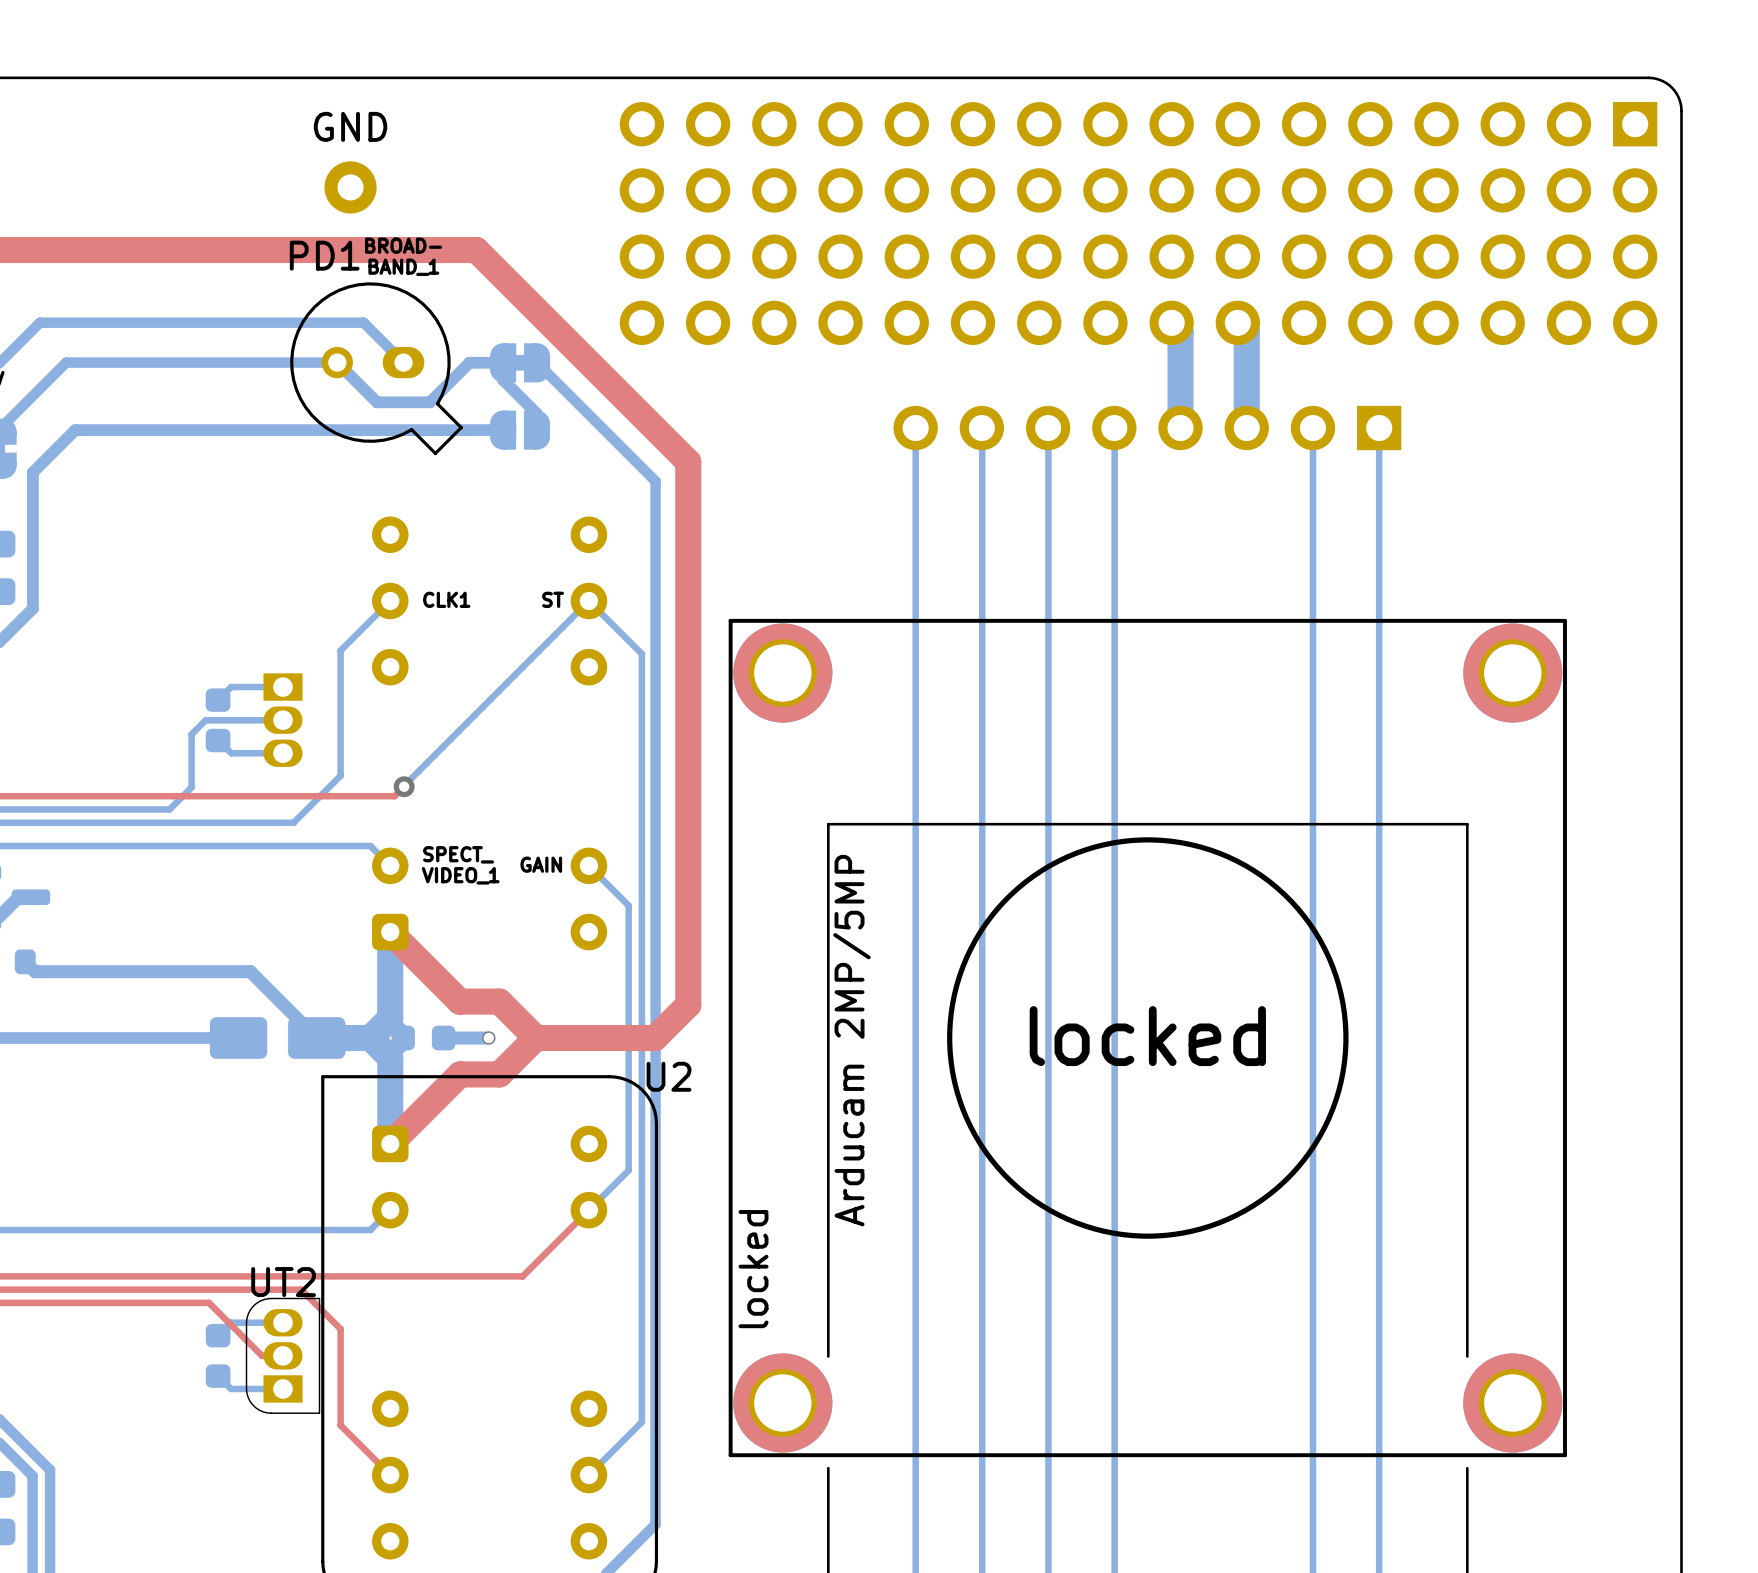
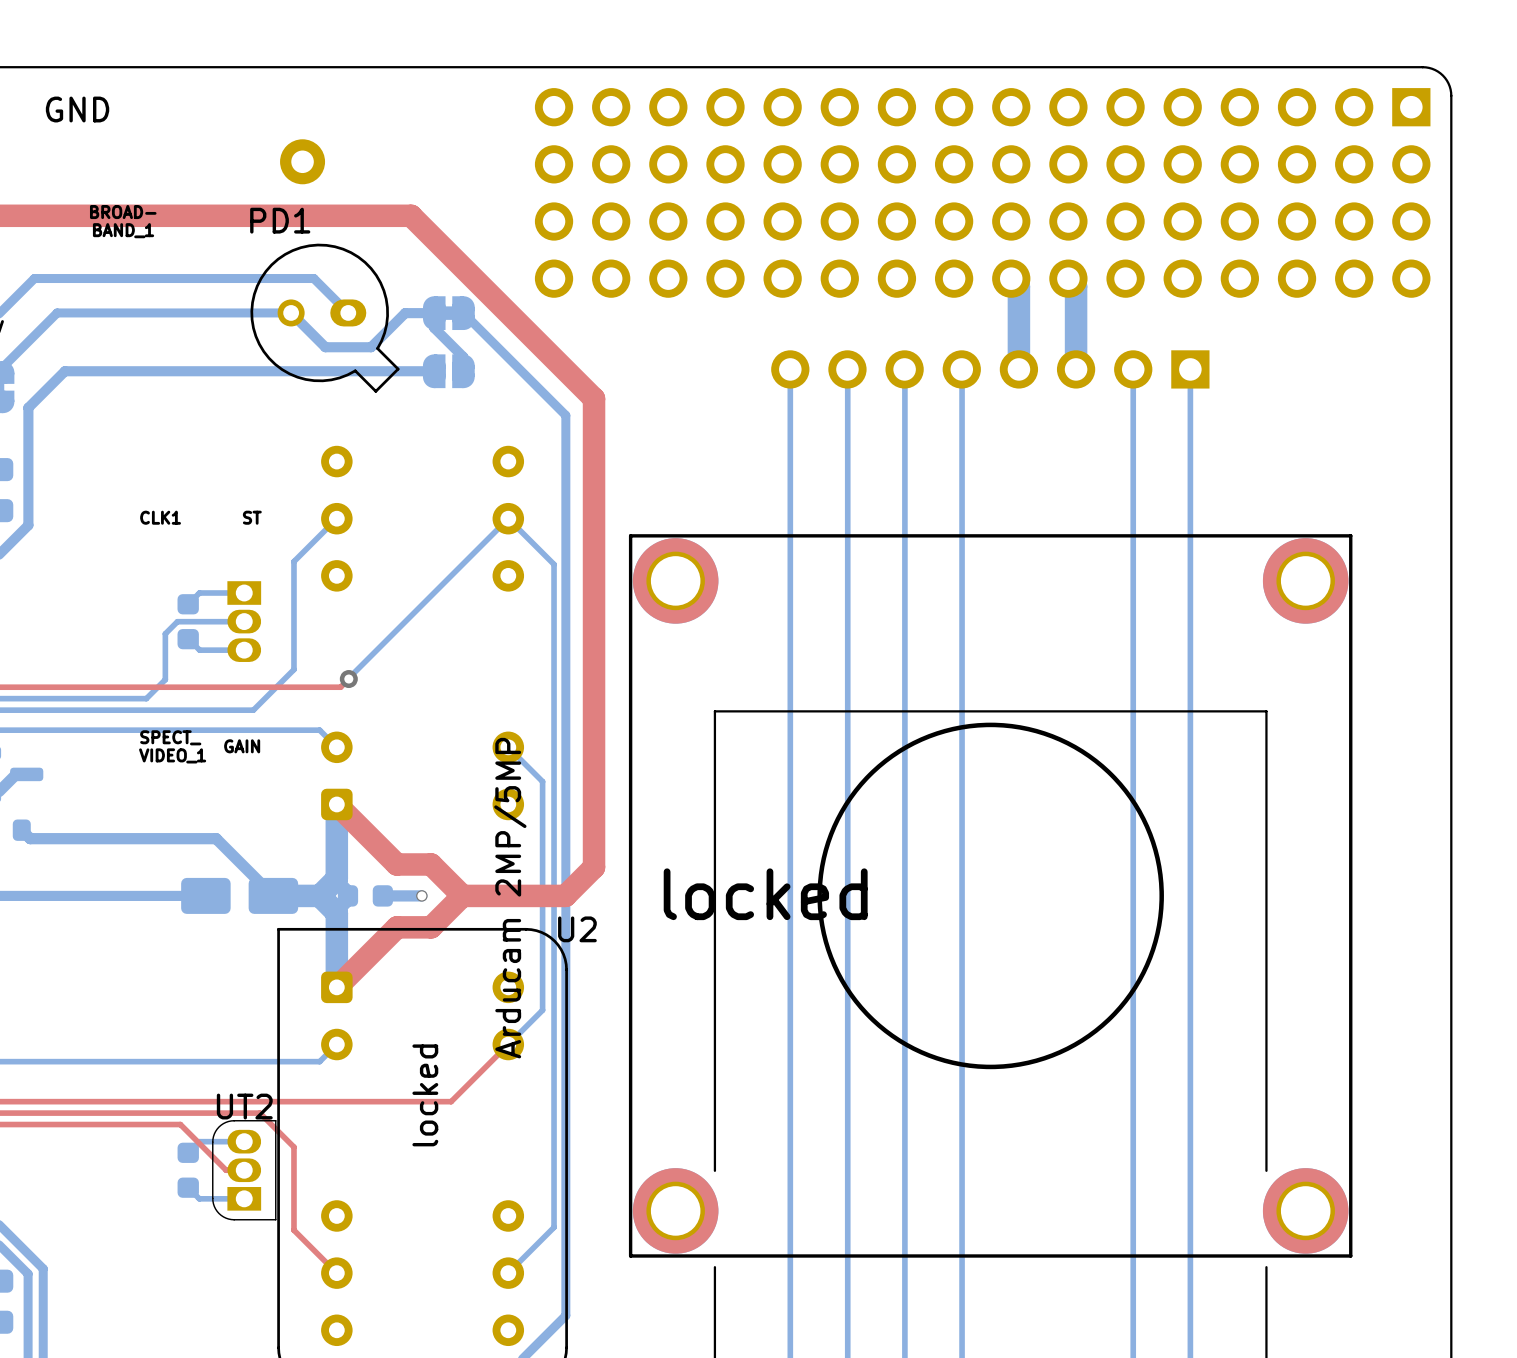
text position: GND (350, 126) -> GND (77, 109)
text position: BROAD- (403, 245) -> BROAD- (123, 212)
text position: BAND_1 (403, 267) -> BAND_1 (123, 230)
text position: CLK1 (446, 599) -> CLK1 (160, 517)
text position: ST (553, 599) -> ST (252, 517)
text position: SPECT_ (458, 854) -> SPECT_ (170, 737)
text position: GAIN (541, 864) -> GAIN (242, 746)
text position: VIDEO_1 (460, 875) -> VIDEO_1 (172, 755)
text position: locked (1147, 1036) -> locked (765, 894)
text position: Arducam 2MP/5MP (852, 1040) -> Arducam 2MP/5MP (510, 898)
text: none -> locked (425, 1095)
text: locked (753, 1269) -> none

